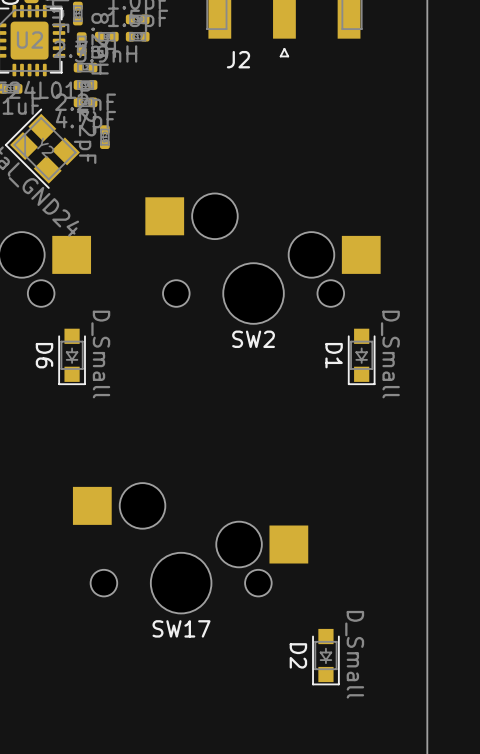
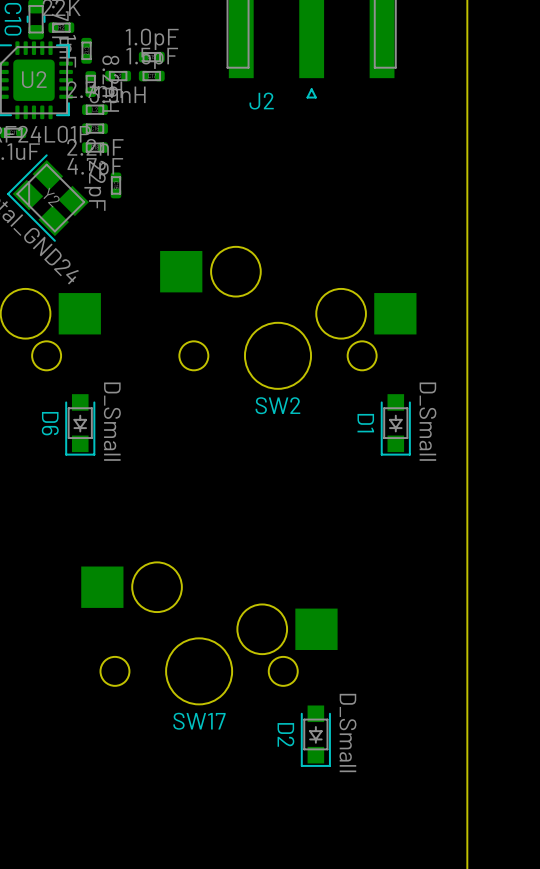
D2 position: (325, 657) -> (315, 736)

